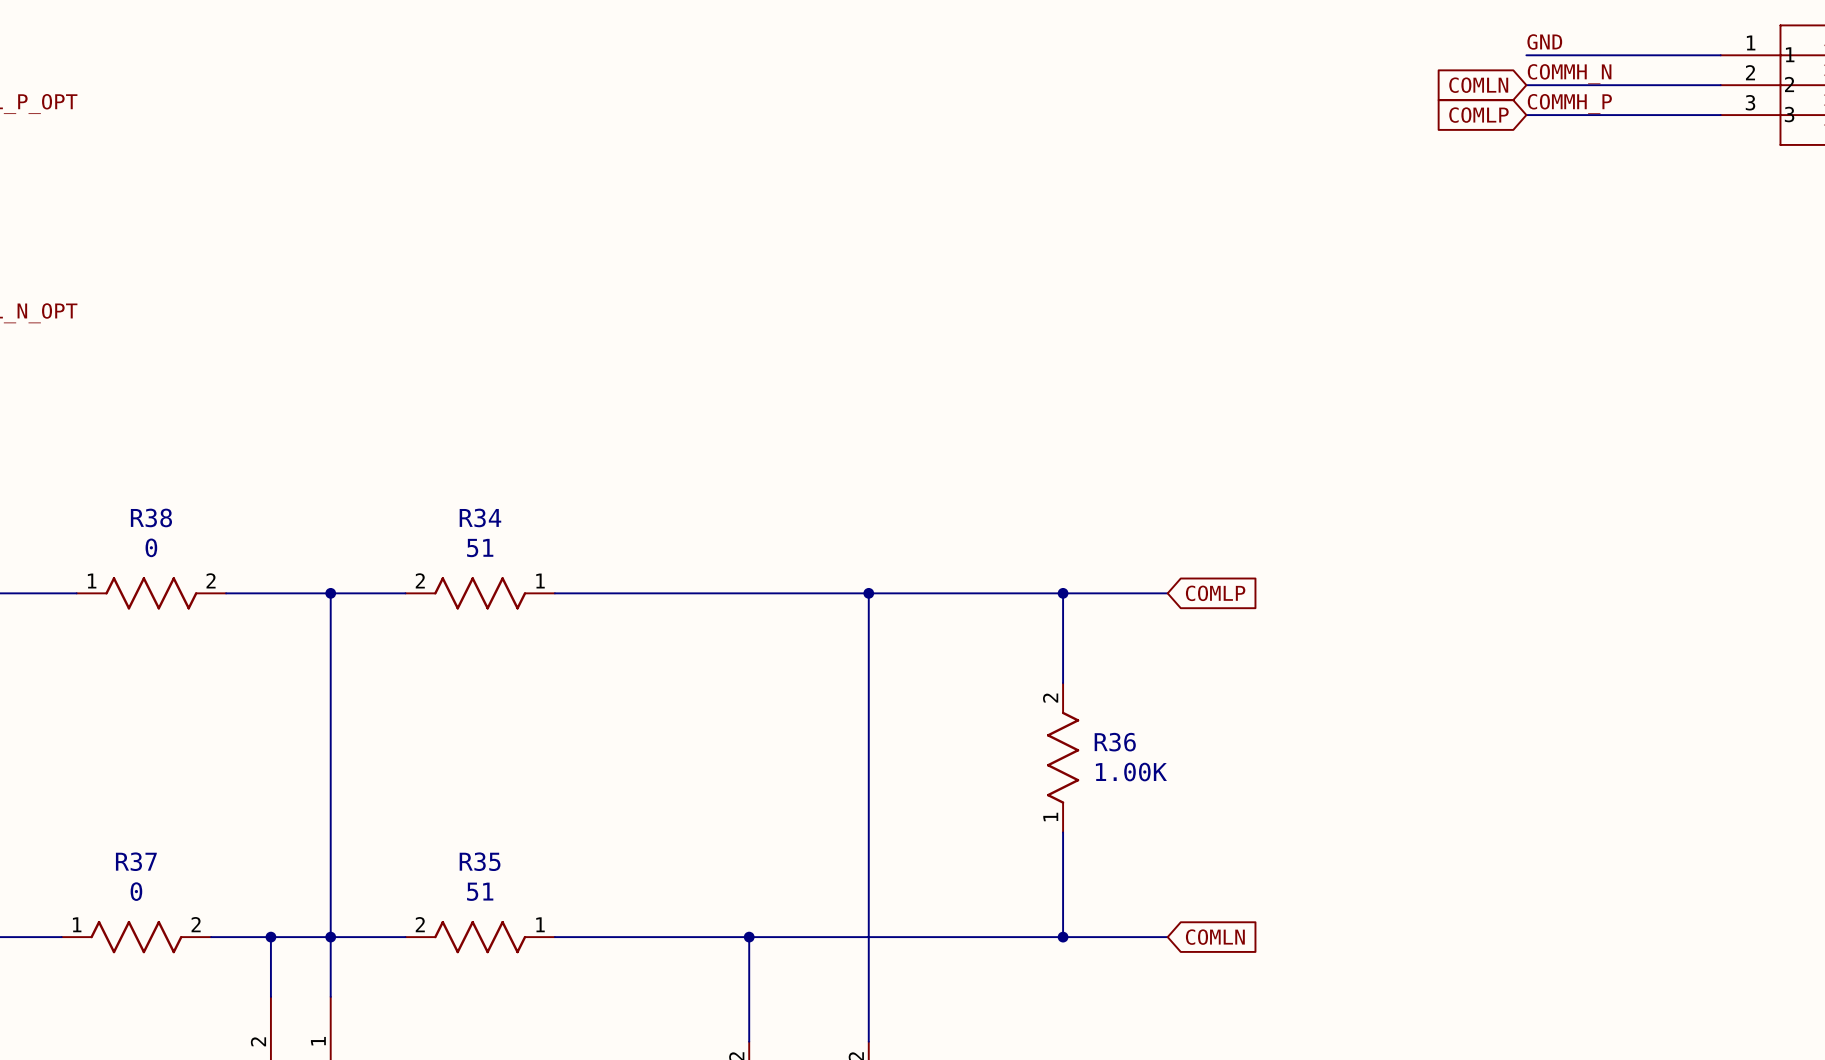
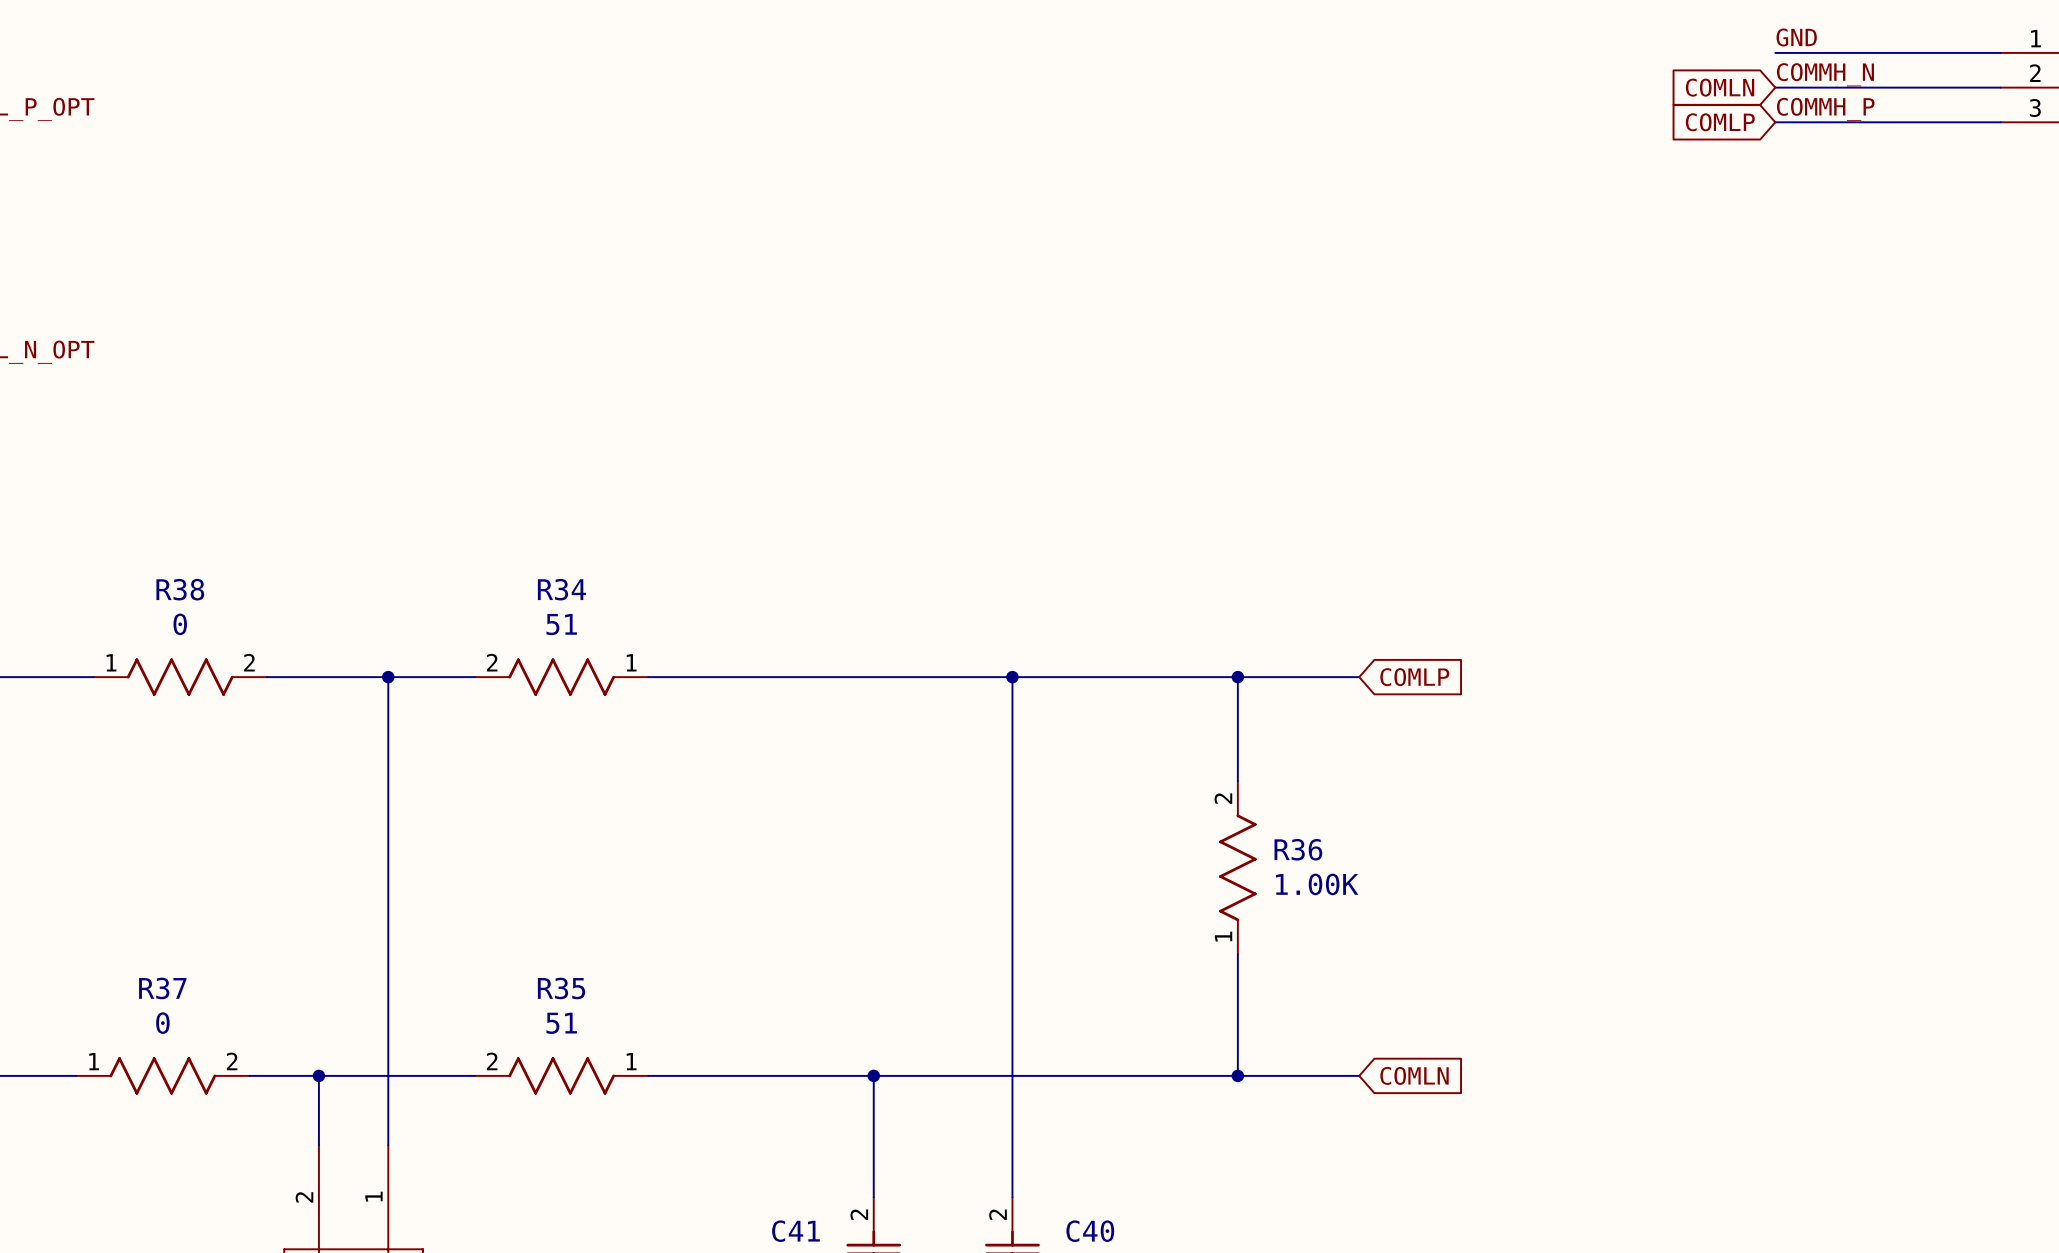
junction: (330, 937) -> none

